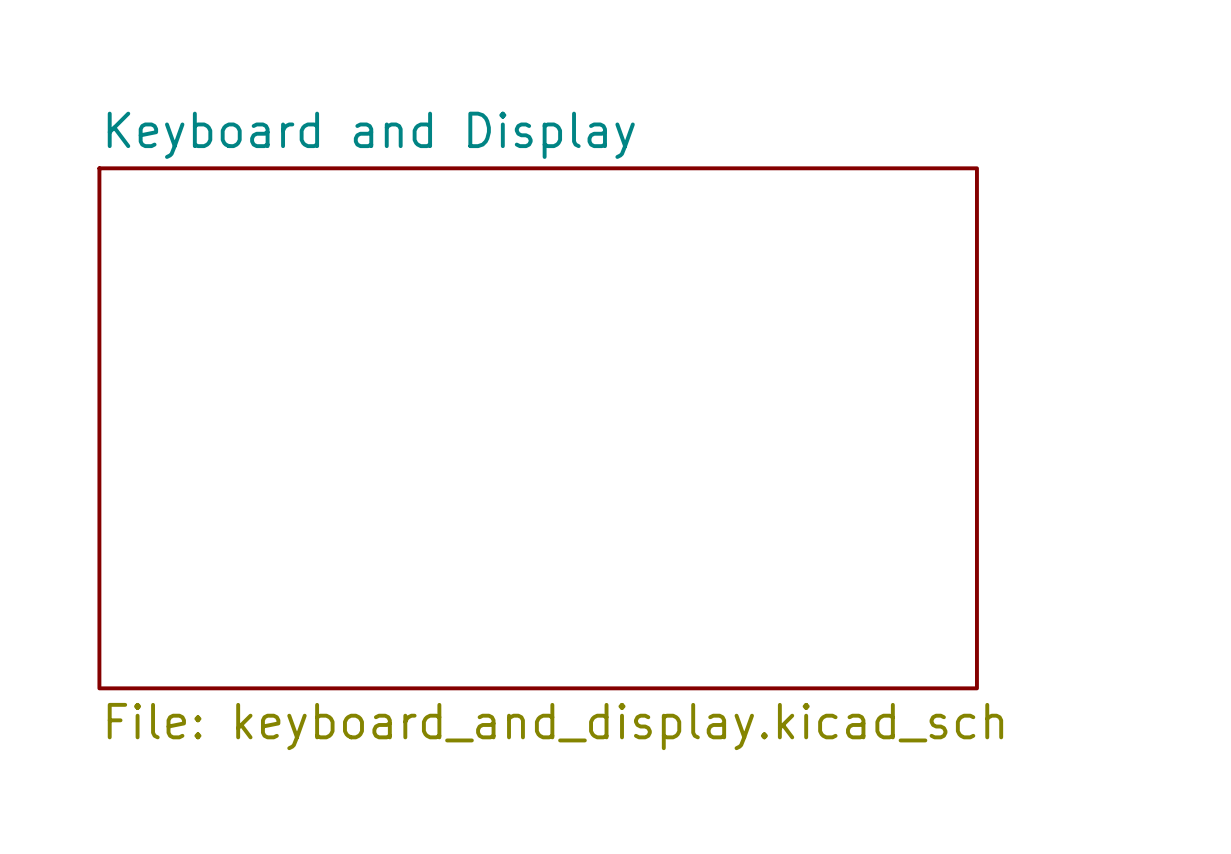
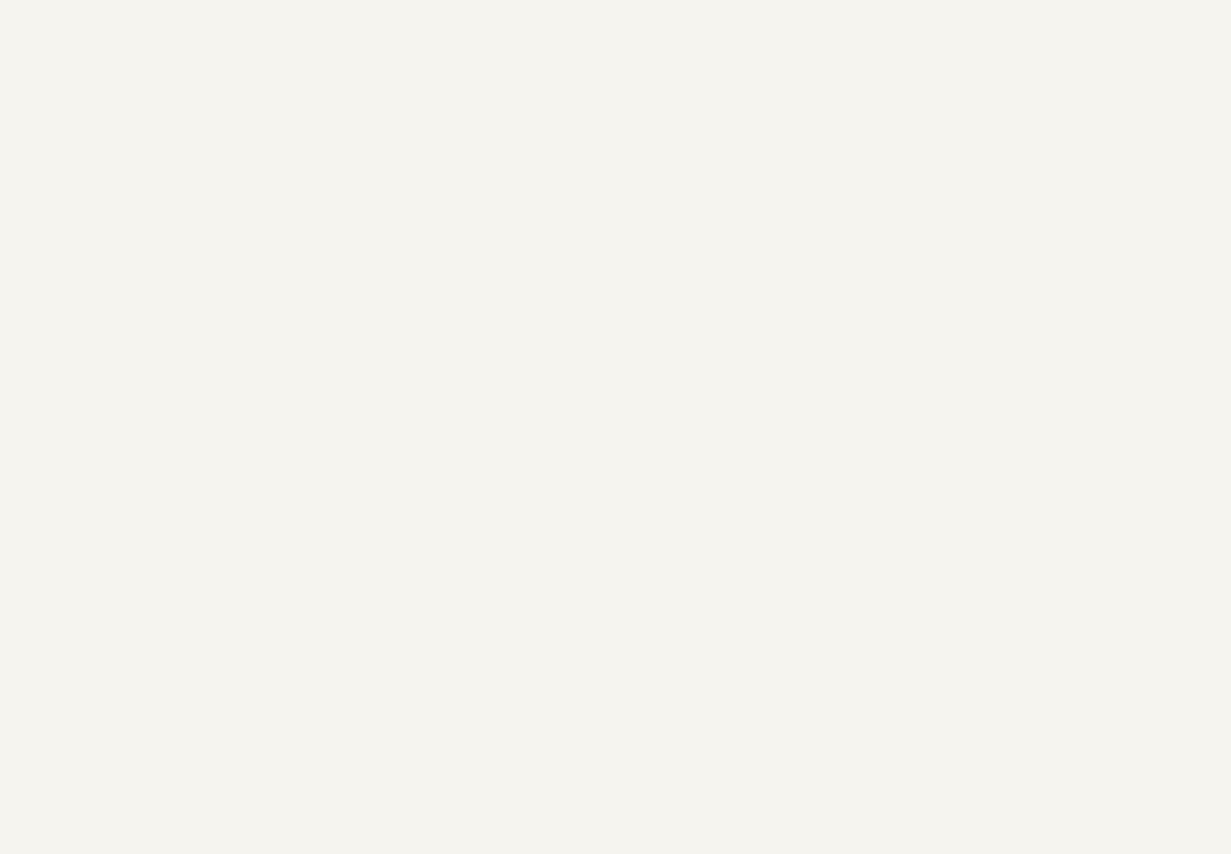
sheet Keyboard and Display: File: keyboard_and_display.kicad_sch (538, 428) -> none

